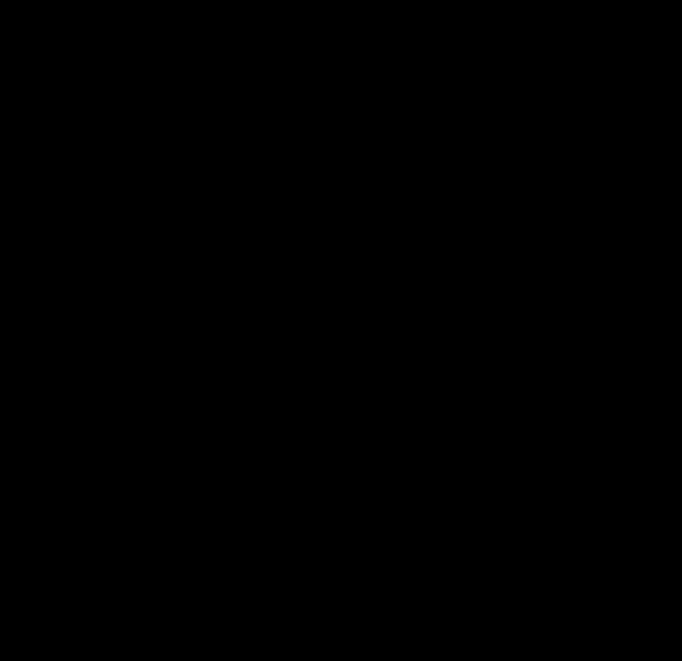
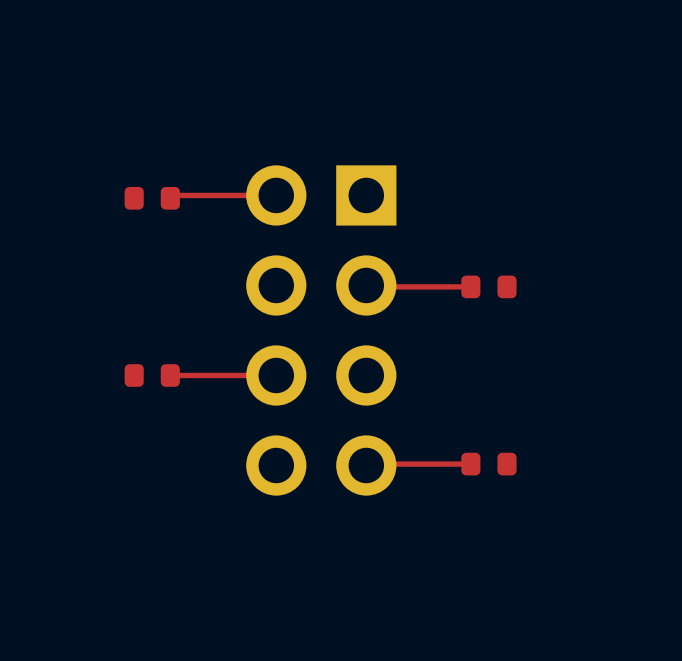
top track: none -> (276, 195) (173, 195) (170, 198)
part: none -> (152, 198)
top track: none -> (366, 285) (470, 286)
part: none -> (488, 286)
part: none -> (321, 330)
part: none -> (152, 375)
top track: none -> (276, 375) (170, 375)
top track: none -> (470, 464) (366, 465)
part: none -> (488, 464)

